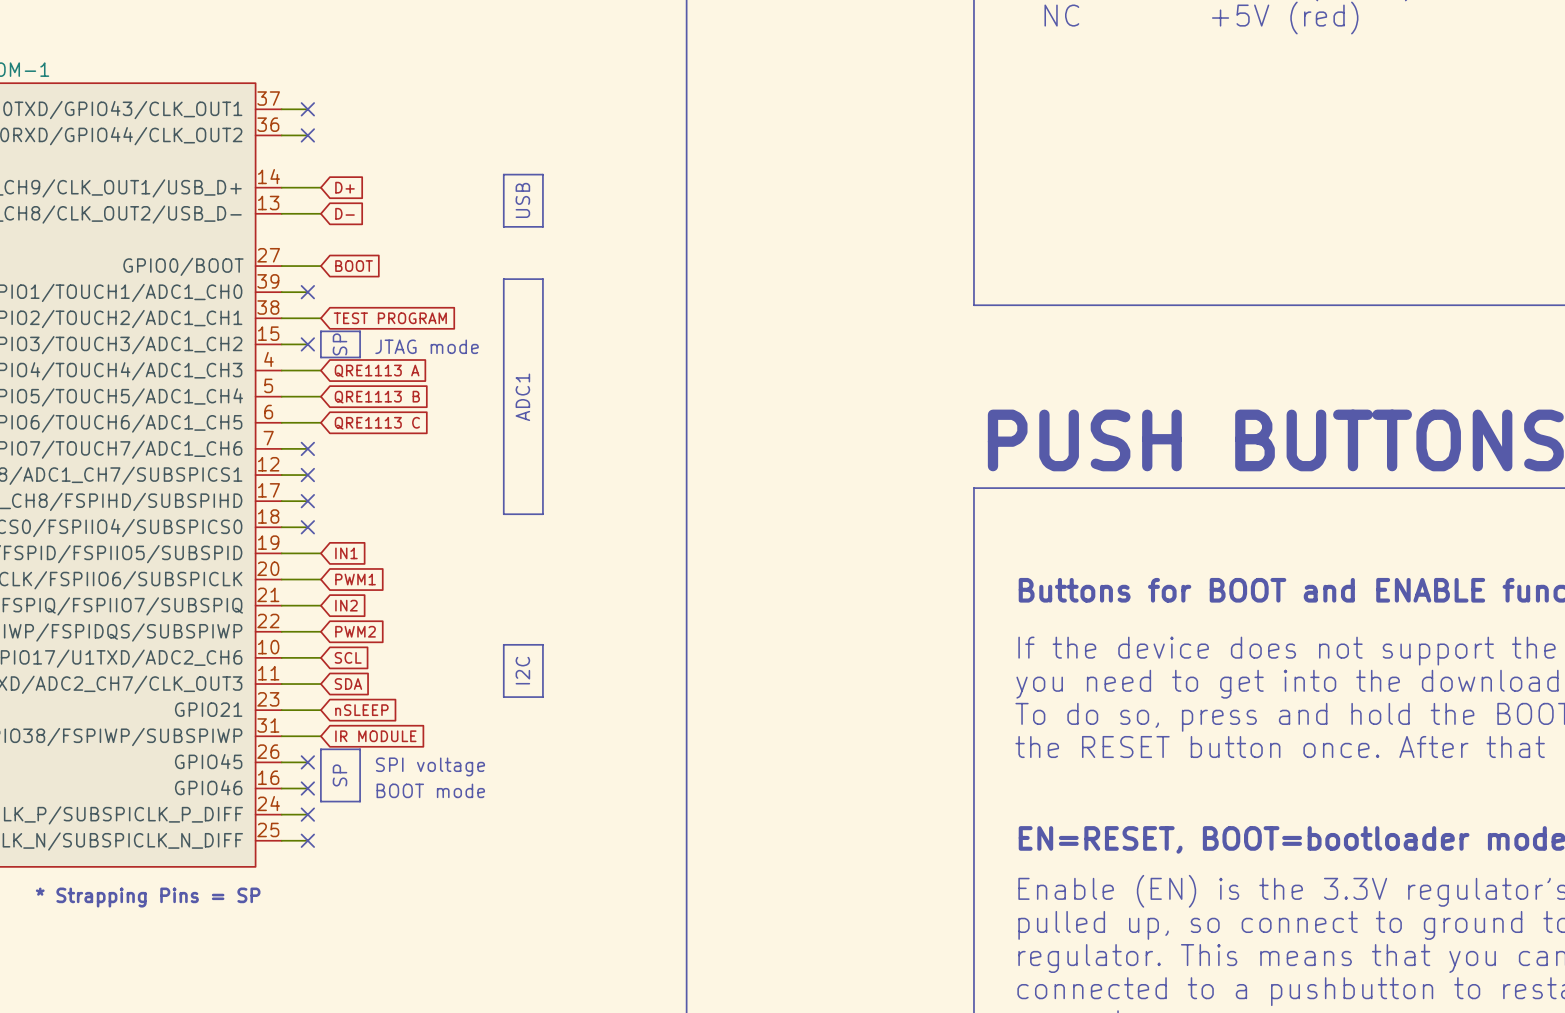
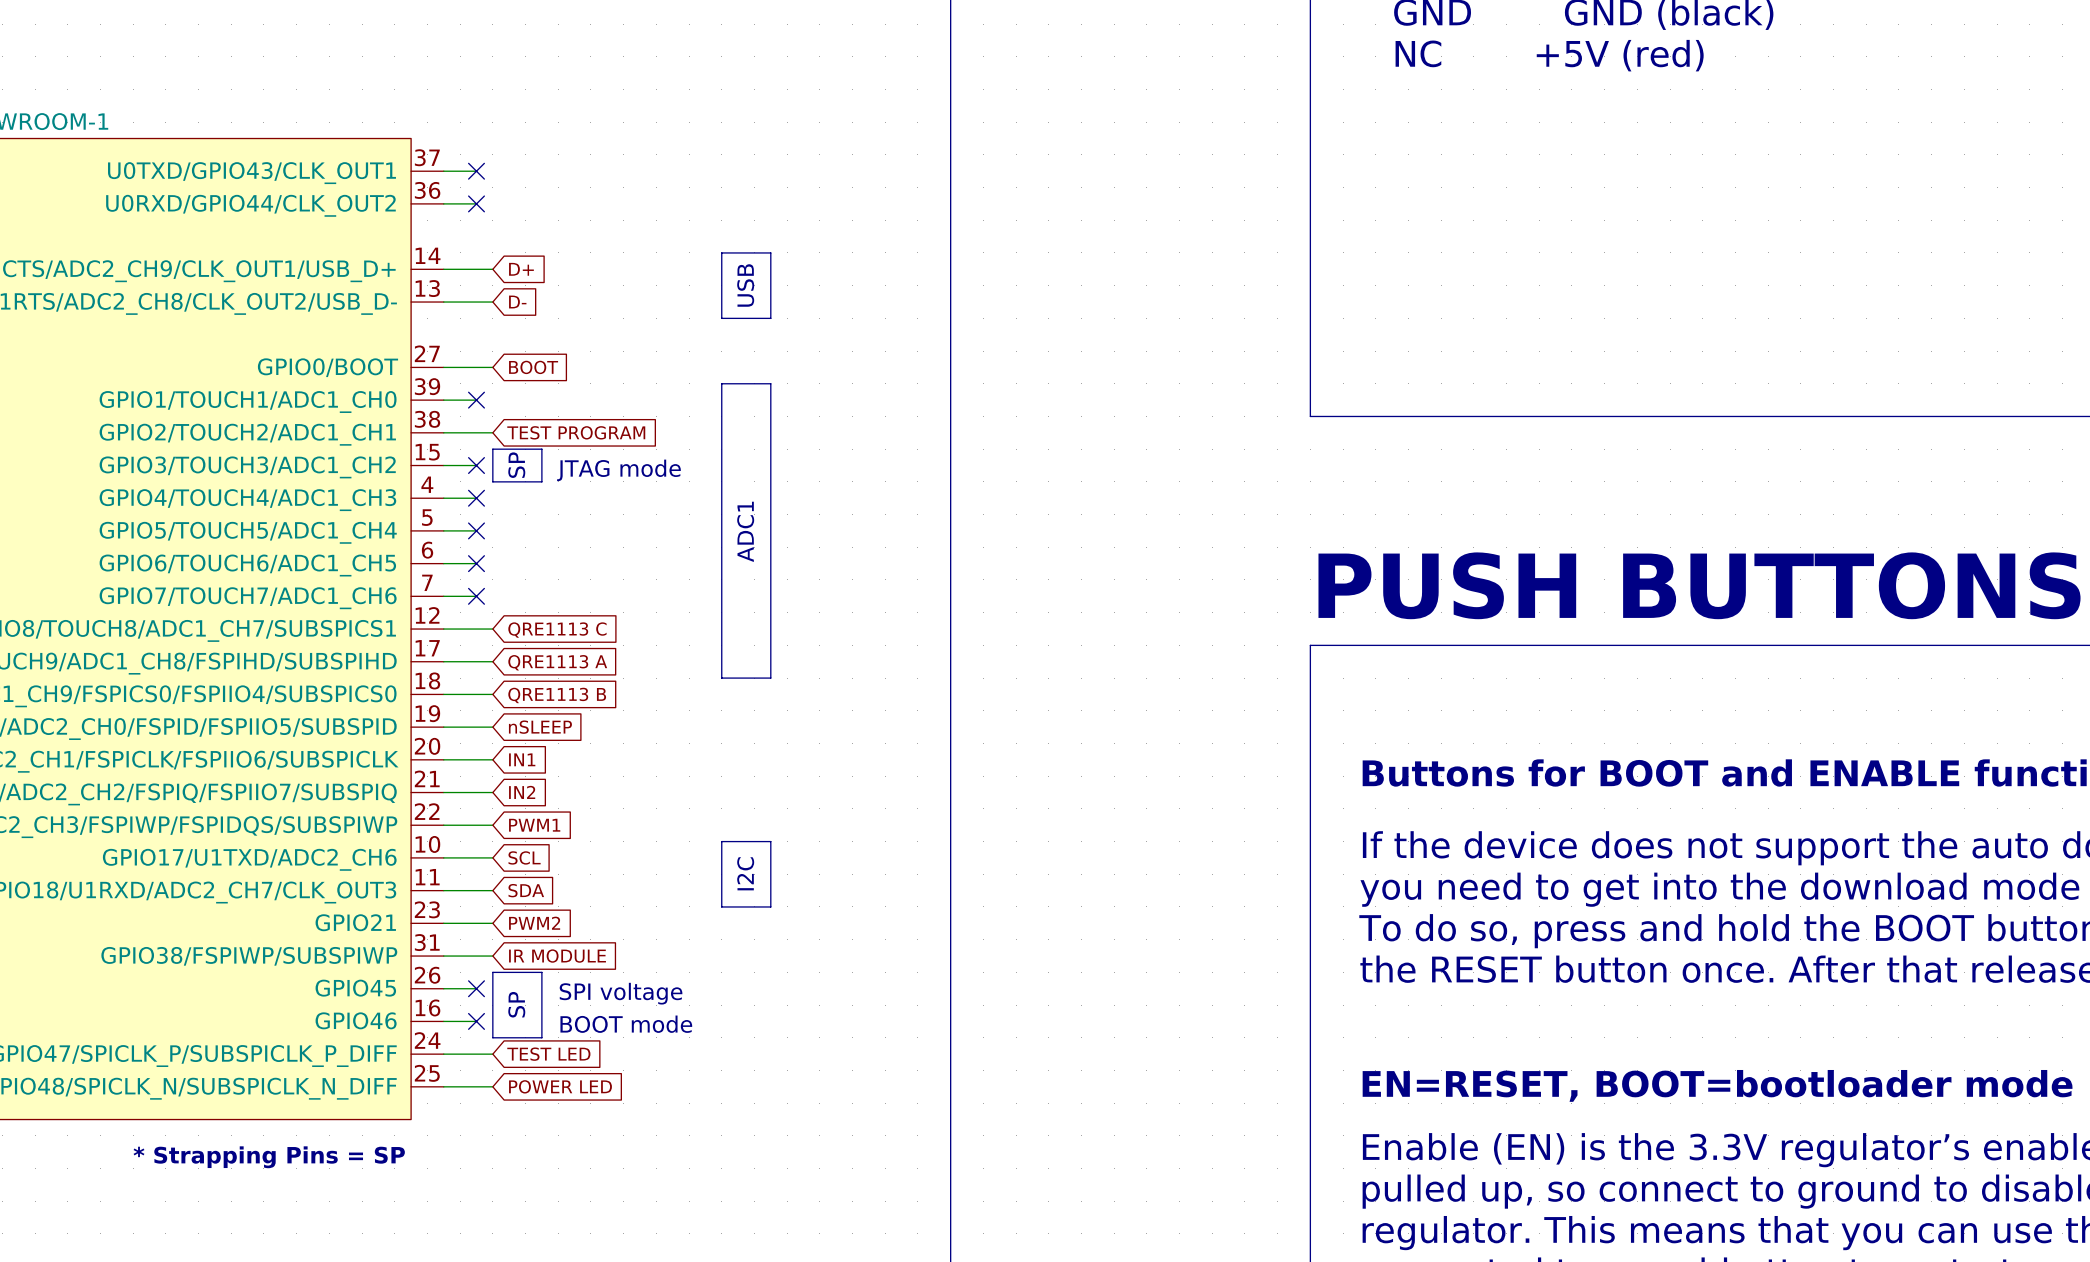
wire: (307, 370) (320, 370) -> (476, 629) (492, 629)
no-connect mark: none -> (476, 498)
global label position: QRE1113 A (377, 371) -> QRE1113 A (557, 662)
wire: (307, 396) (320, 396) -> (476, 661) (492, 661)
no-connect mark: none -> (476, 530)
global label position: QRE1113 B (377, 397) -> QRE1113 B (557, 695)
wire: (307, 422) (320, 422) -> (476, 694) (492, 694)
no-connect mark: none -> (476, 563)
global label position: QRE1113 C (377, 423) -> QRE1113 C (557, 630)
no-connect mark: (307, 475) -> none
no-connect mark: (307, 501) -> none
no-connect mark: (307, 527) -> none
global label: IN1 (346, 553) -> nSLEEP (540, 727)
global label: PWM1 (355, 579) -> IN1 (522, 759)
global label: PWM2 (355, 631) -> PWM1 (534, 825)
global label: nSLEEP (361, 710) -> PWM2 (534, 923)
wire: none -> (476, 1054) (492, 1054)
no-connect mark: (307, 814) -> none
global label: none -> TEST LED (548, 1054)
wire: none -> (476, 1086) (492, 1086)
no-connect mark: (307, 840) -> none
global label: none -> POWER LED (560, 1086)

